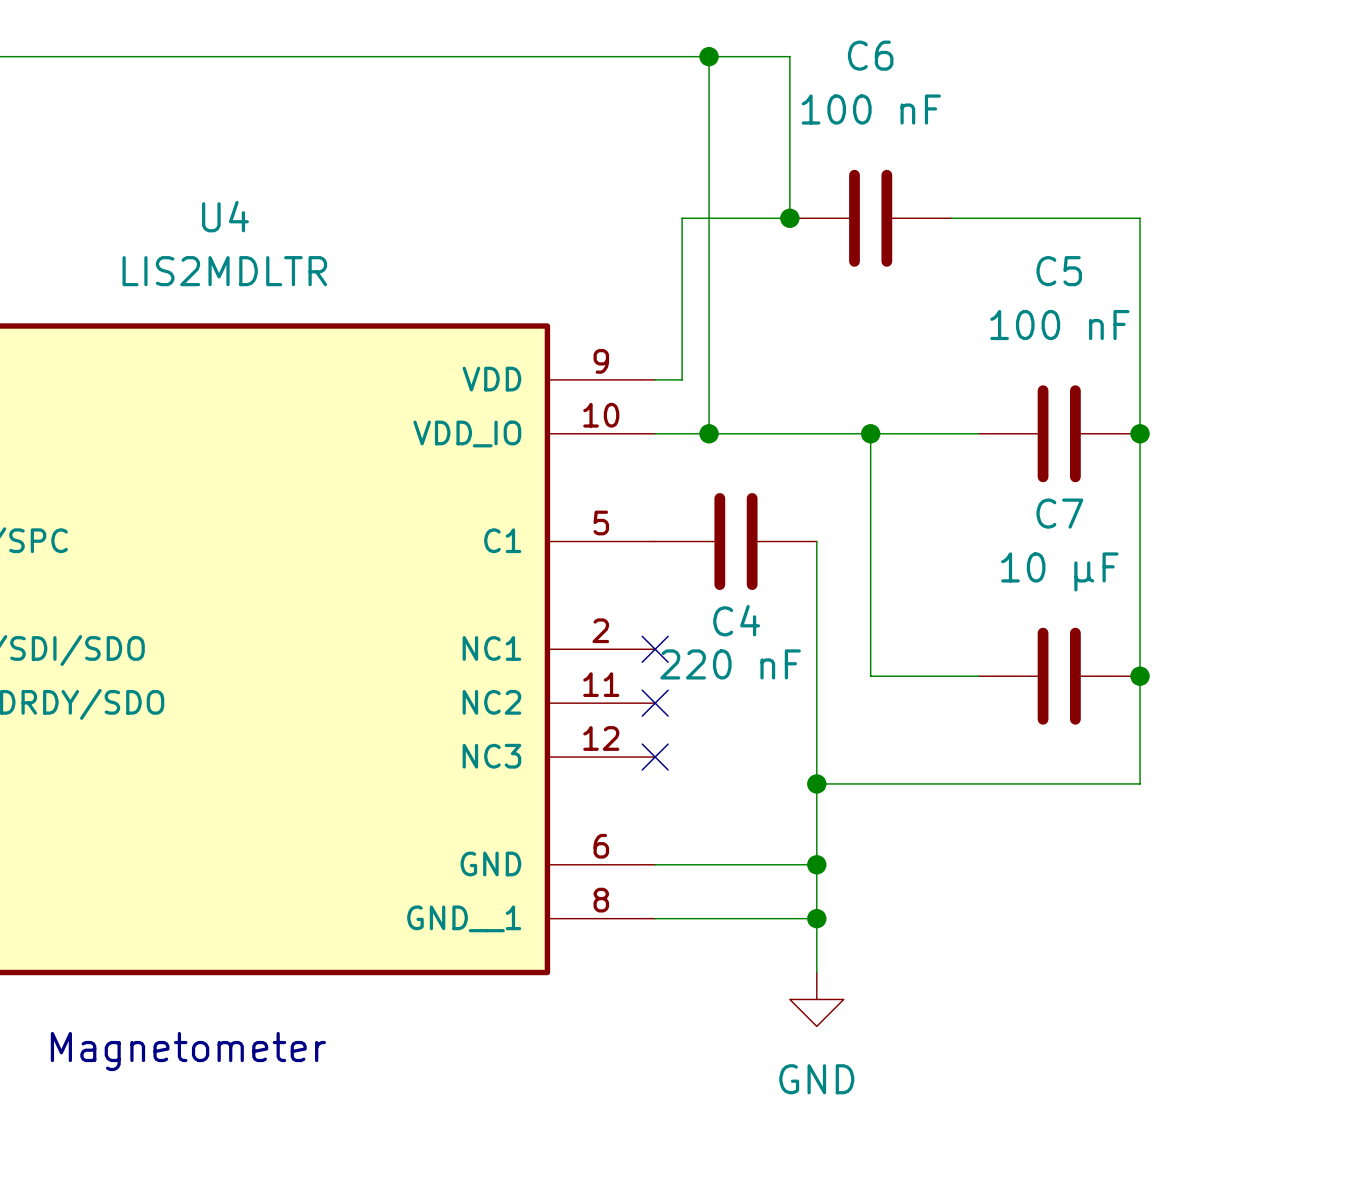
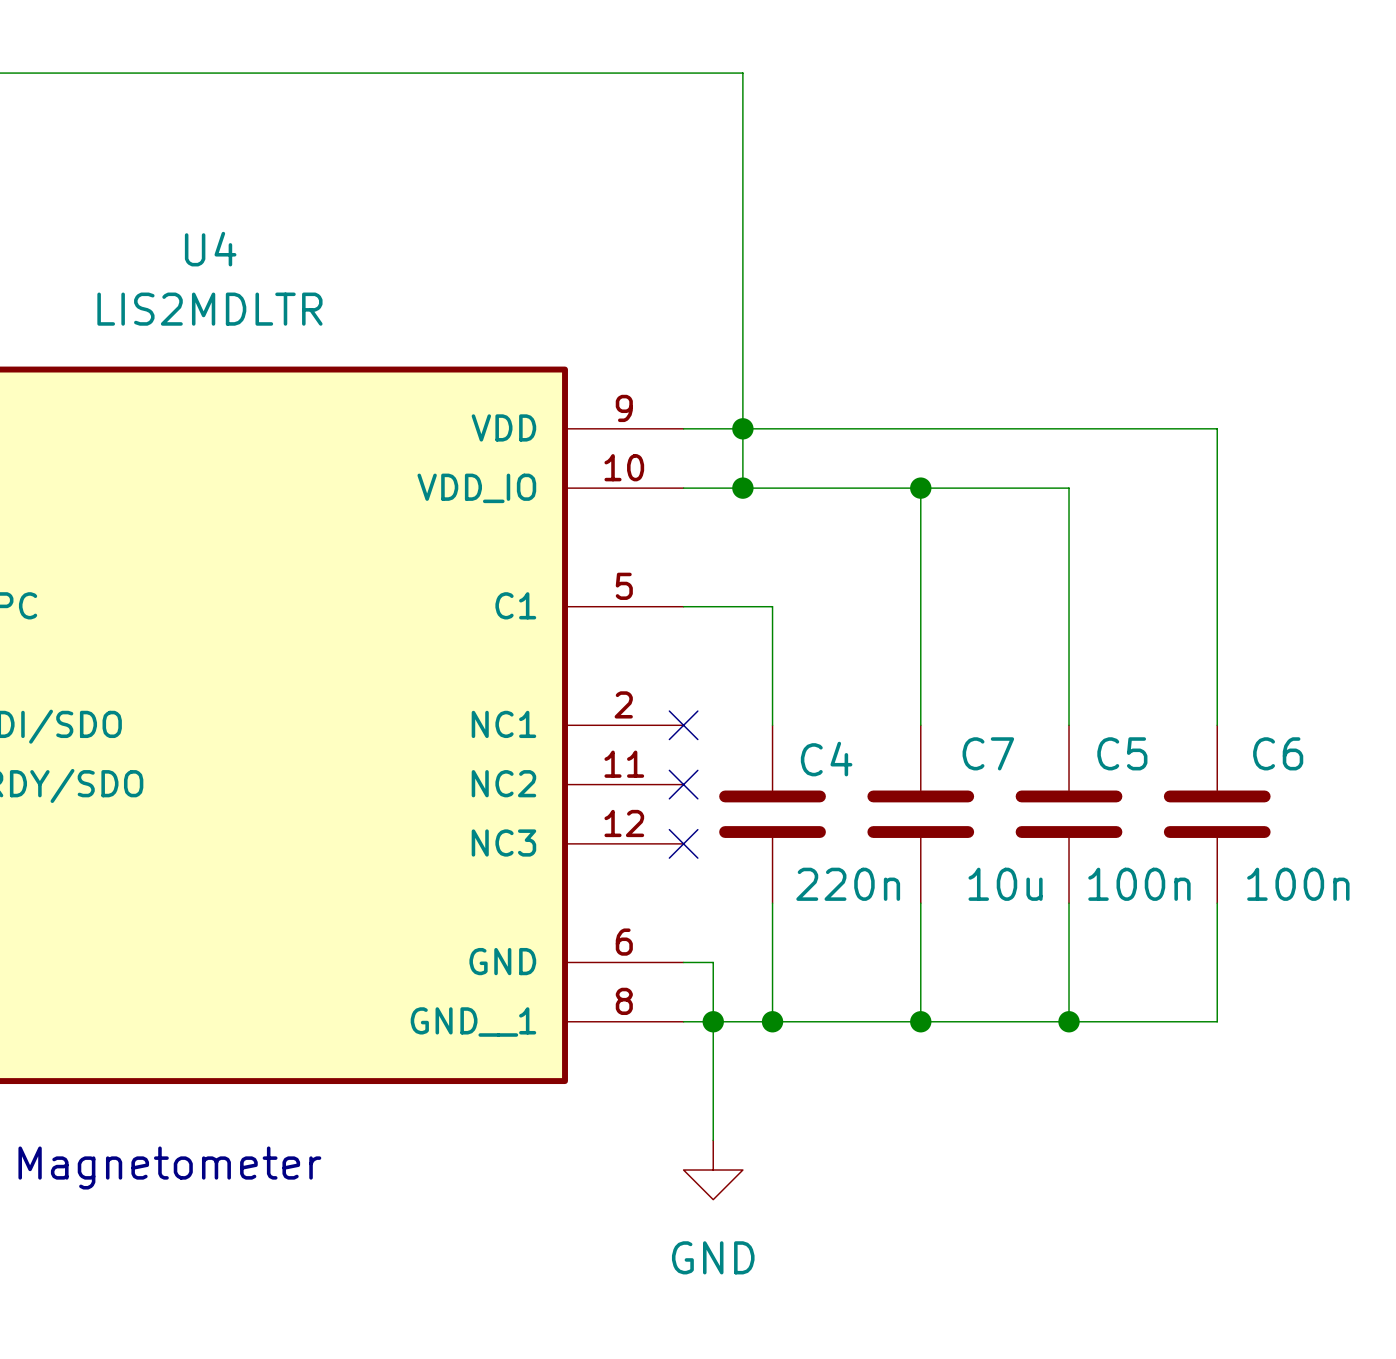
C6 name position: C6 (870, 55) -> C6 (1278, 753)
wire: (709, 56) (789, 56) (789, 218) (682, 218) (682, 379) -> none
junction: (709, 56) -> none
C6 value: 100 nF (871, 109) -> 100n (1298, 884)
junction: (789, 218) -> none
C6 rotation: 0° (870, 218) -> 90° clockwise (1217, 814)
C6 position: (870, 218) -> (1217, 814)
wire: (951, 218) (1140, 218) (1140, 379) -> (713, 428) (1217, 428)
C5 name position: C5 (1059, 271) -> C5 (1122, 753)
C5 value: 100 nF (1059, 325) -> 100n (1139, 884)
junction: none -> (742, 428)
wire: none -> (1039, 488) (1069, 488) (1069, 725)
C5 rotation: 0° (1059, 433) -> 90° clockwise (1069, 814)
C5 position: (1059, 433) -> (1069, 814)
junction: (1140, 433) -> none
C7 name position: C7 (1059, 513) -> C7 (988, 753)
wire: none -> (683, 606) (772, 606) (772, 725)
C4 rotation: 0° (735, 541) -> 90° clockwise (772, 814)
C4 position: (735, 541) -> (772, 814)
wire: (816, 541) (816, 972) -> none
C7 value: 10 μF (1059, 571) -> 10u (1005, 884)
C4 name position: C4 (736, 620) -> C4 (826, 759)
wire: (870, 649) (870, 676) (978, 676) -> none
wire: (1140, 649) (1140, 783) (816, 783) -> none
C4 value: 220 nF (730, 664) -> 220n (848, 884)
C7 rotation: 0° (1059, 676) -> 90° clockwise (920, 814)
C7 position: (1059, 676) -> (920, 814)
junction: (1140, 676) -> none
junction: (816, 783) -> none
wire: none -> (772, 903) (772, 1021)
wire: none -> (920, 903) (920, 1021)
wire: none -> (1069, 903) (1069, 1021)
wire: none -> (1217, 903) (1217, 1021) (861, 1021)
wire: (682, 864) (816, 864) -> (713, 962) (713, 1140)
junction: (816, 864) -> none
junction: none -> (713, 1021)
junction: none -> (772, 1021)
junction: (816, 918) -> none
junction: none -> (920, 1021)
junction: none -> (1069, 1021)
power symbol position: GND (816, 999) -> GND (713, 1170)

